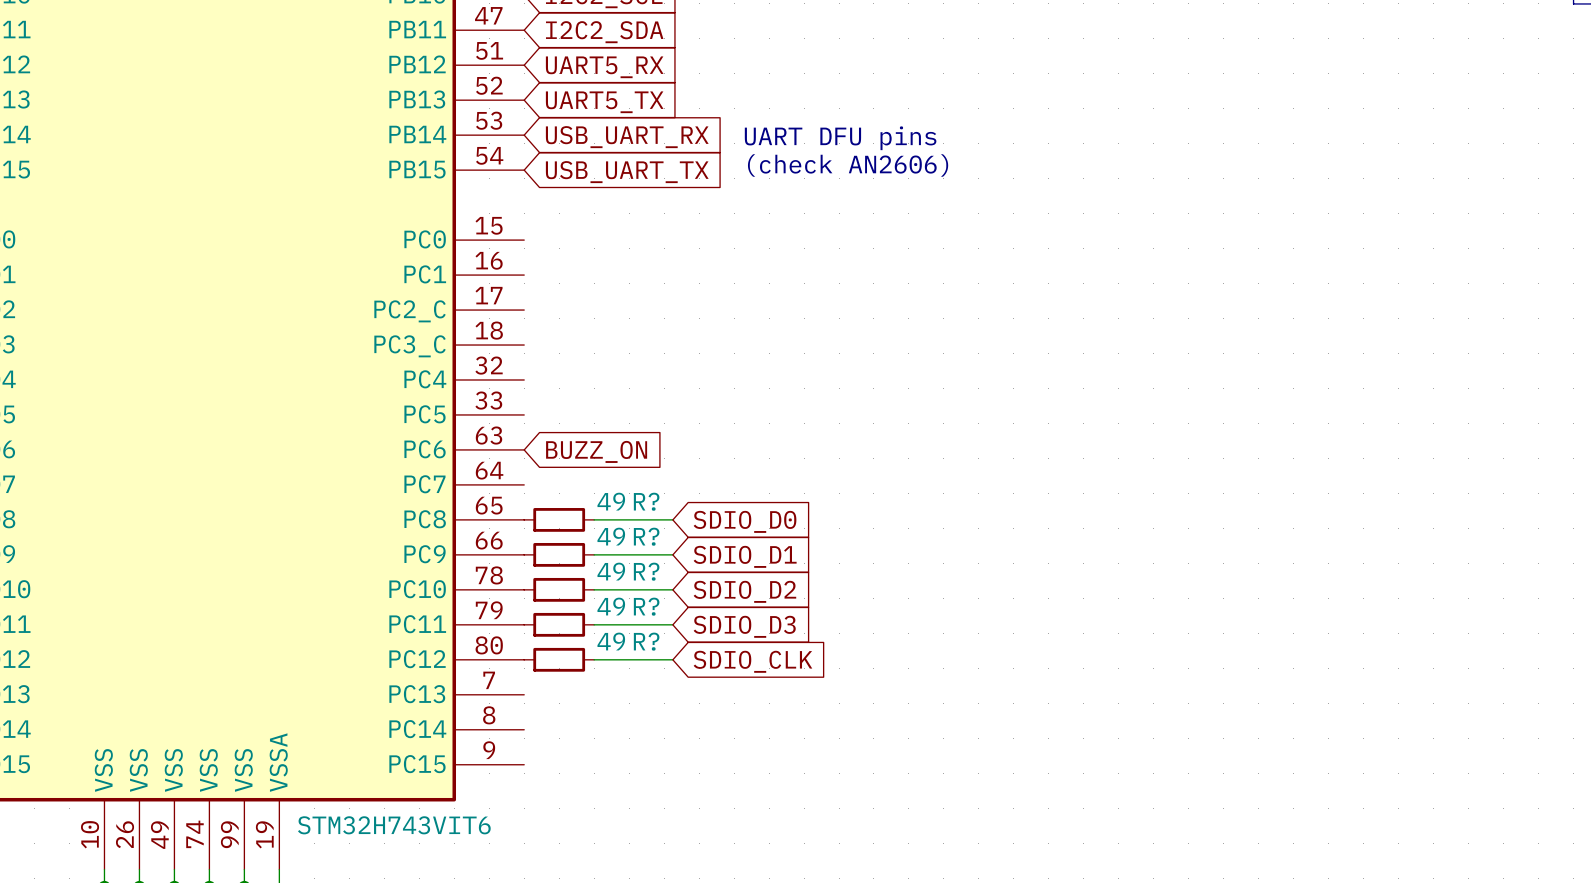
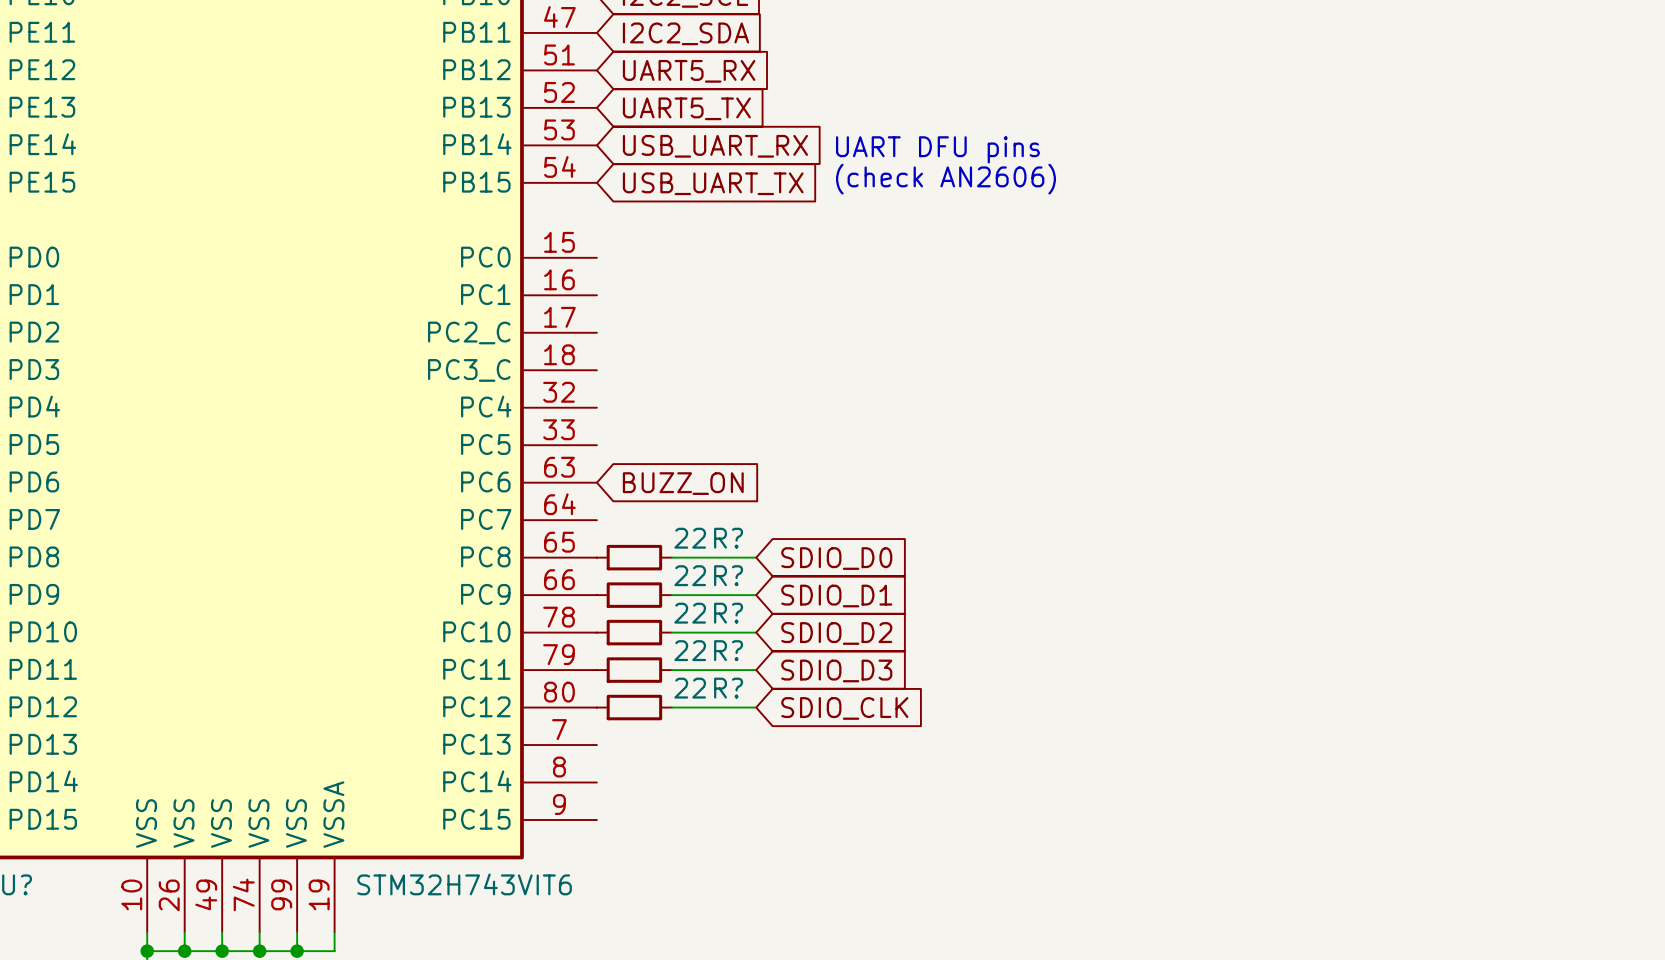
R? value: 49 (611, 501) -> 22 (690, 538)
R? value: 49 (611, 536) -> 22 (690, 575)
R? value: 49 (611, 571) -> 22 (690, 613)
R? value: 49 (611, 606) -> 22 (690, 650)
R? value: 49 (611, 641) -> 22 (690, 688)

